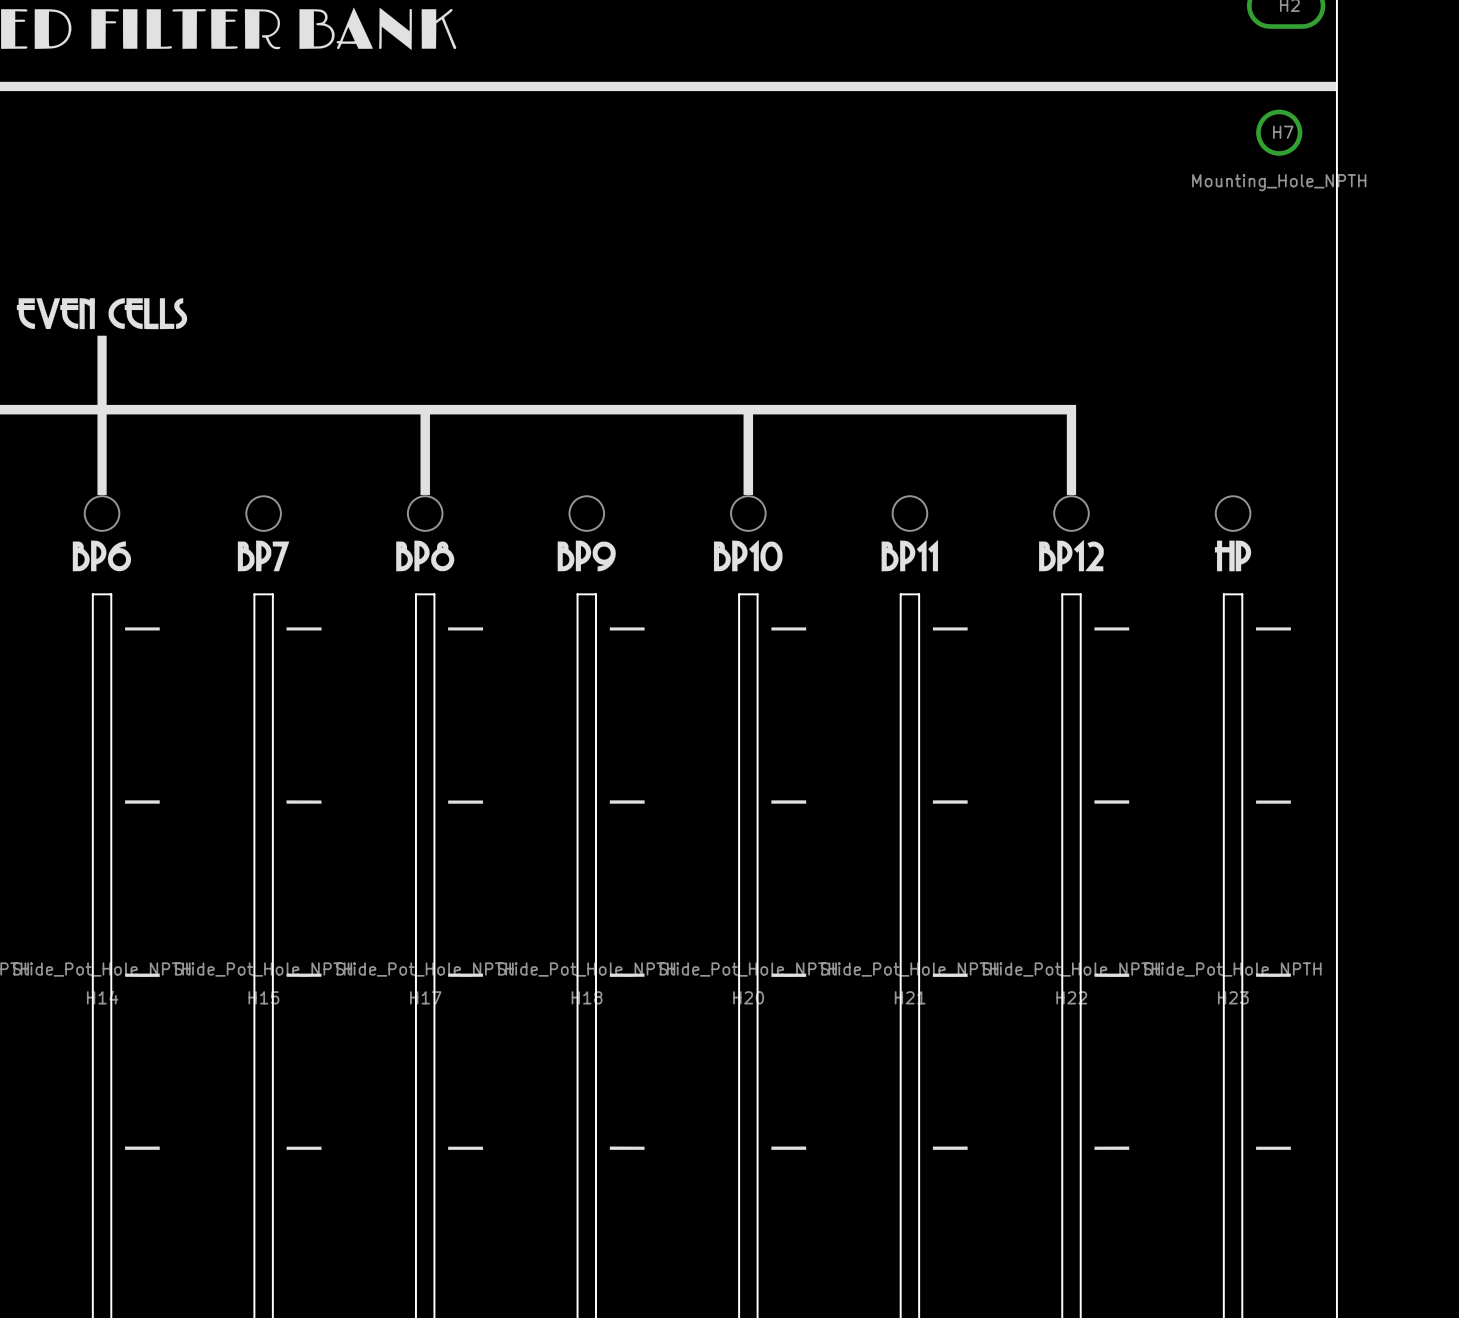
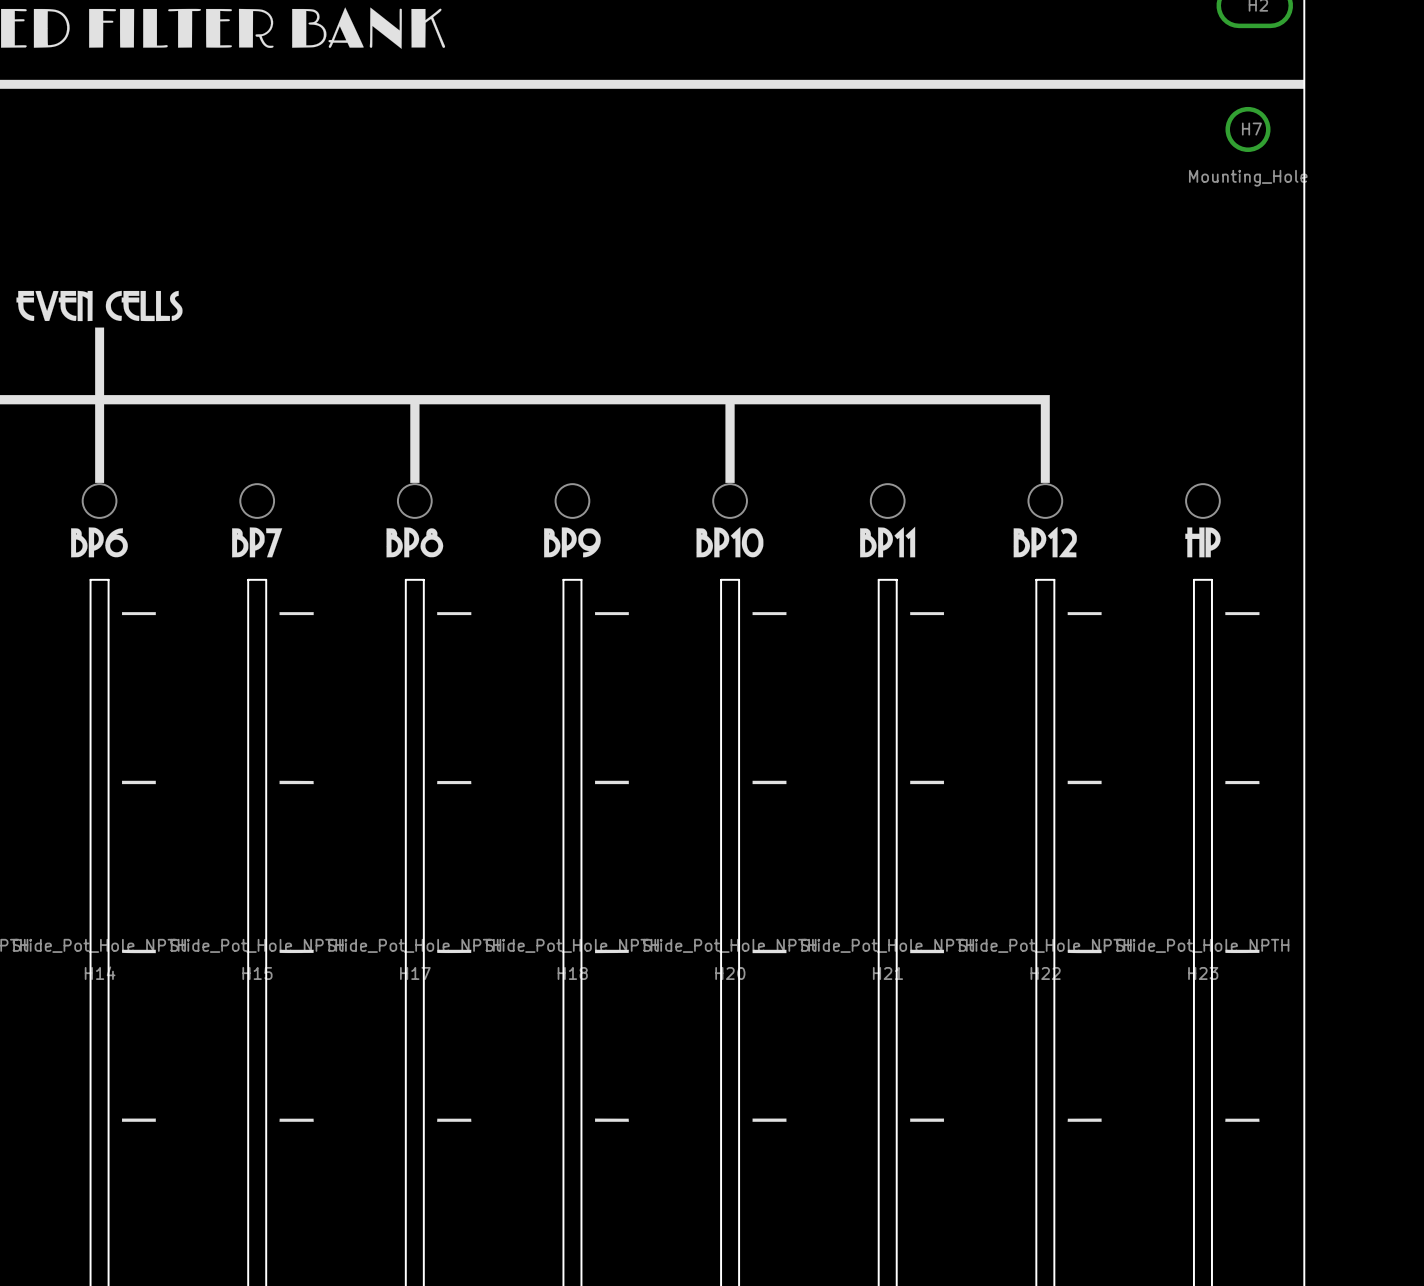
H7 value: Mounting_Hole_NPTH (1279, 182) -> Mounting_Hole (1248, 178)

